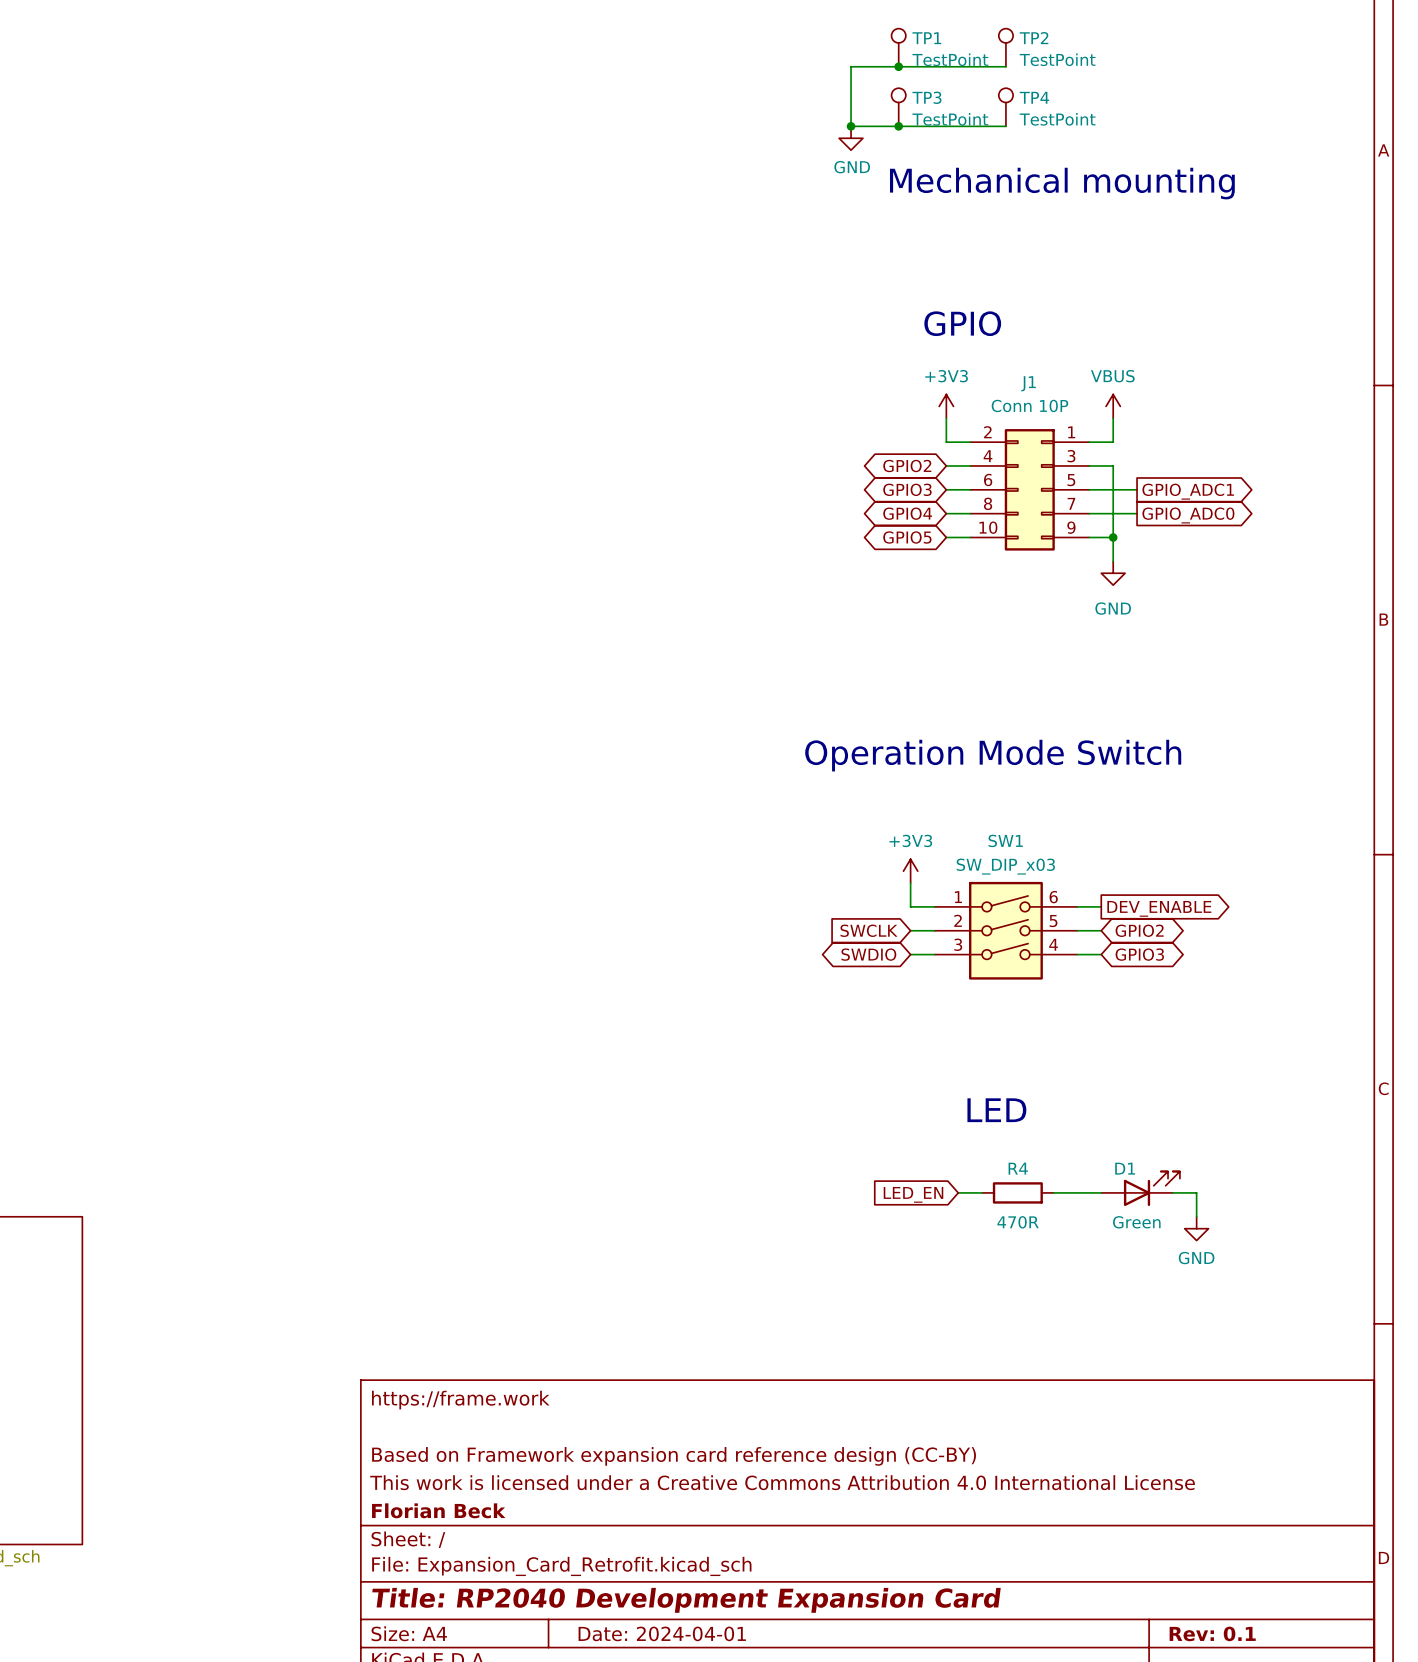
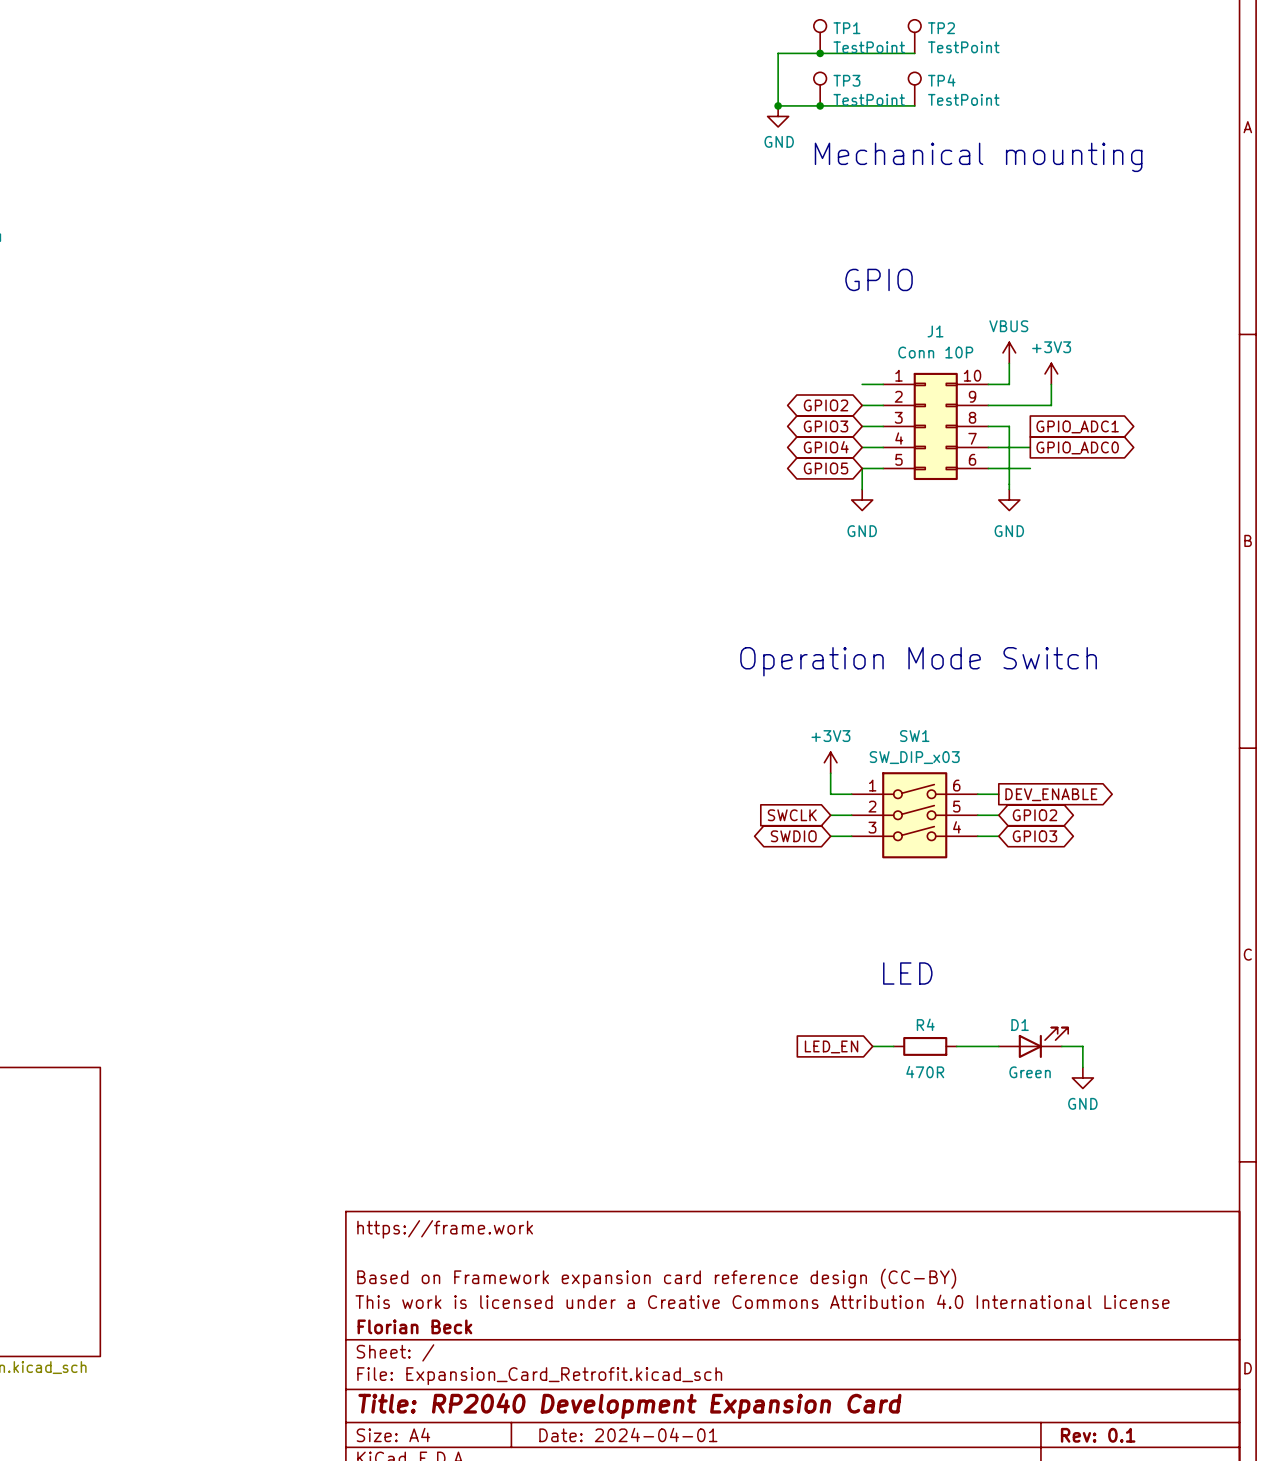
power symbol position: +3V3 (946, 406) -> +3V3 (1051, 373)
wire: (946, 418) (946, 442) -> (862, 468) (862, 489)
J1 symbol: [970, 429, 1090, 551] -> [883, 372, 989, 481]
wire: (1113, 465) (1113, 489) (1137, 489) -> (1009, 405) (1051, 405) (1051, 384)
wire: none -> (1009, 468) (1030, 468)
junction: (1113, 537) -> none
power symbol: none -> GND (862, 500)

